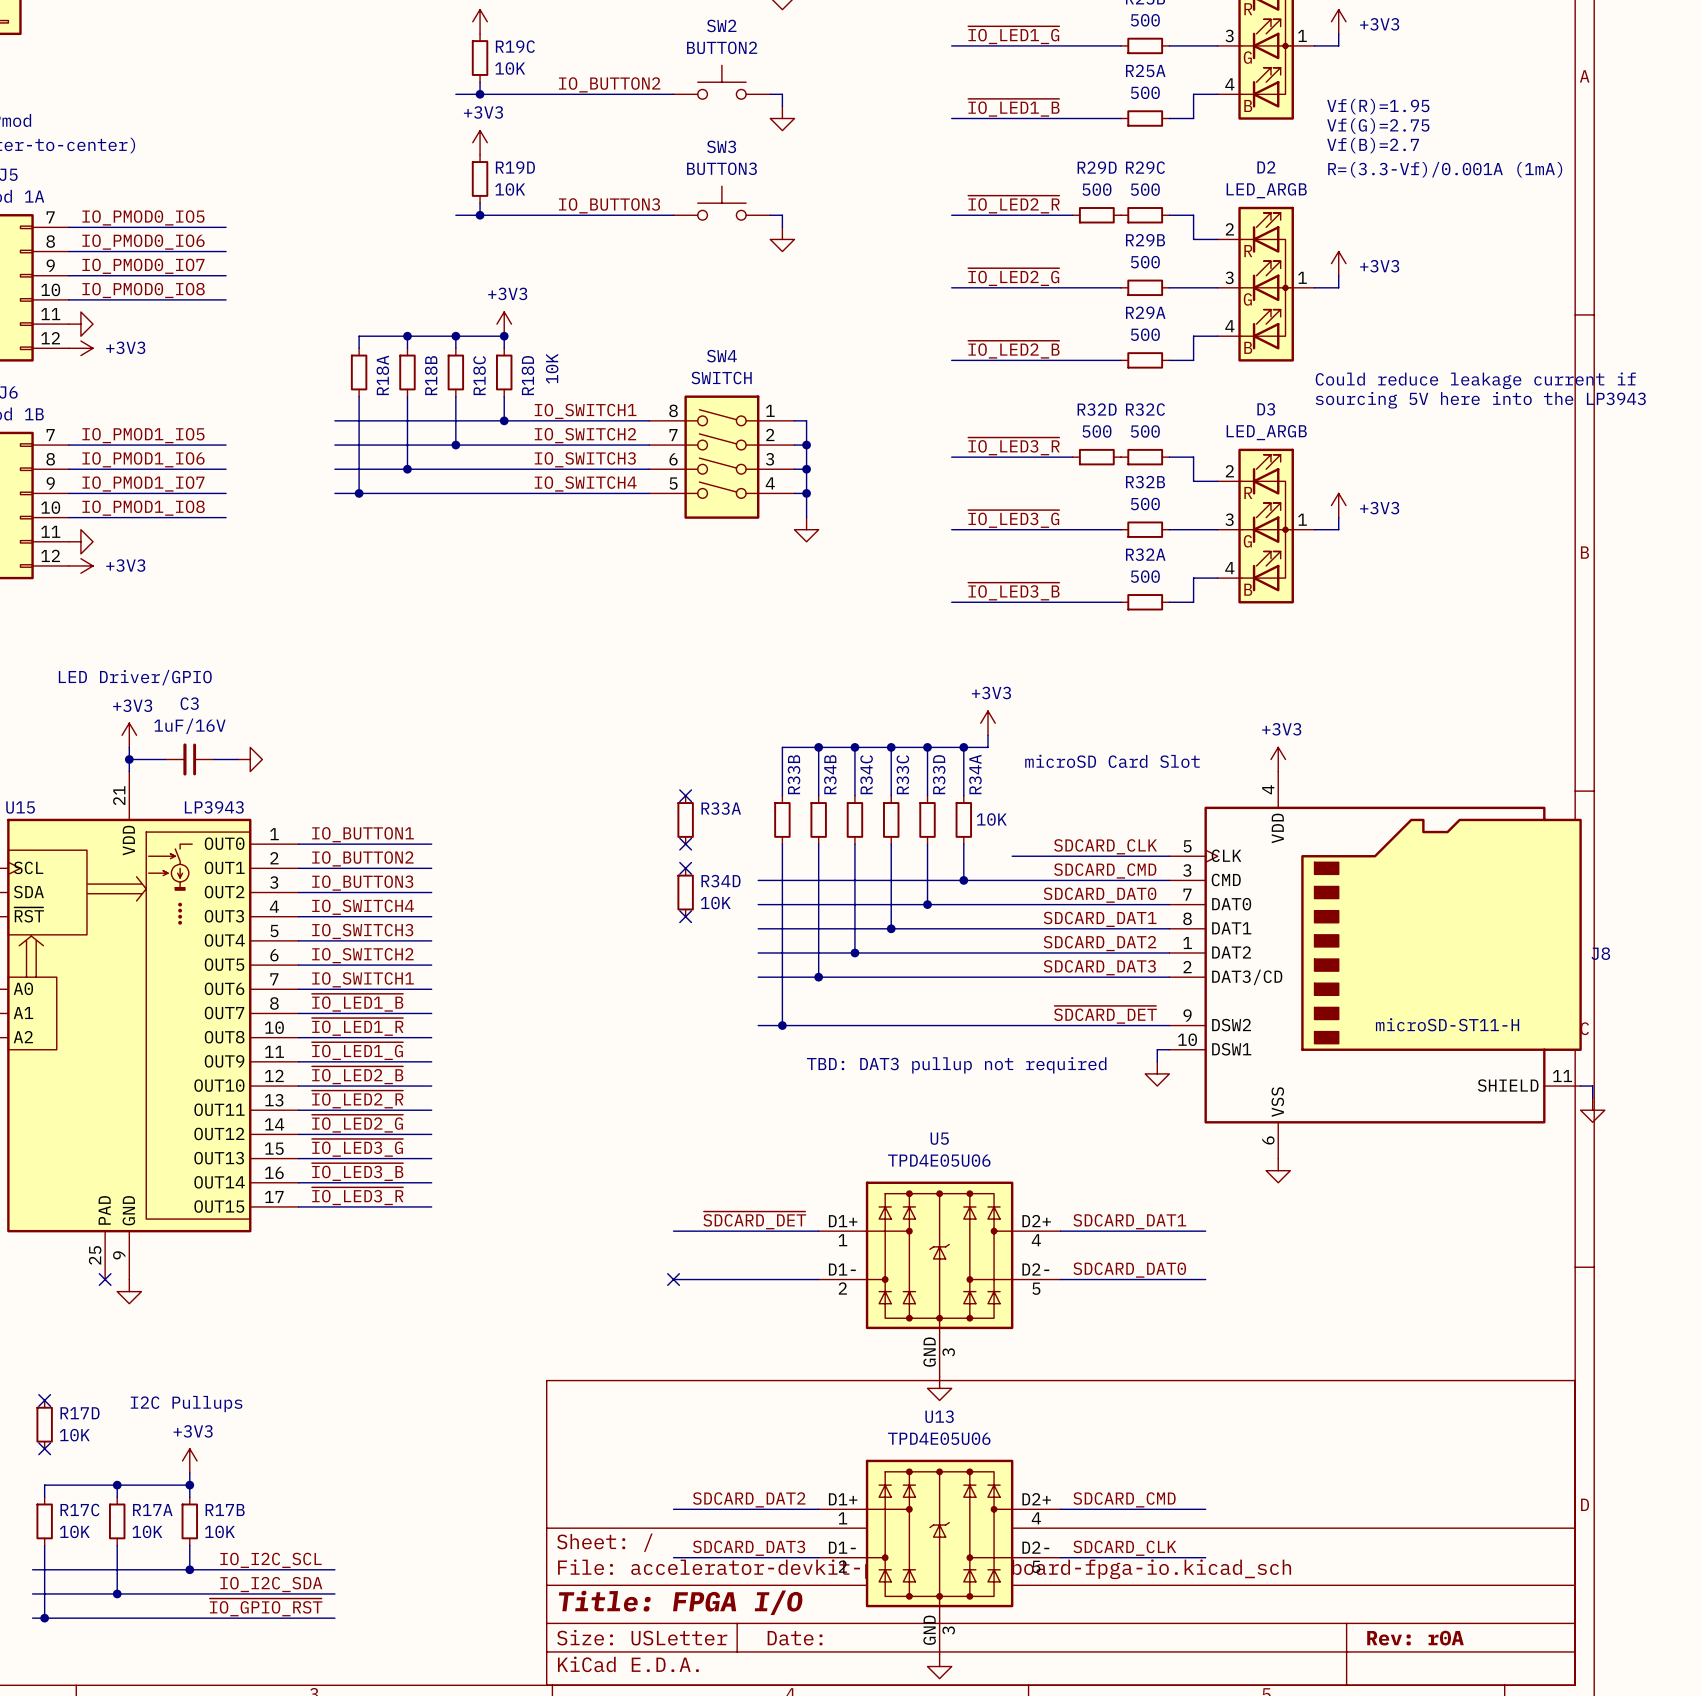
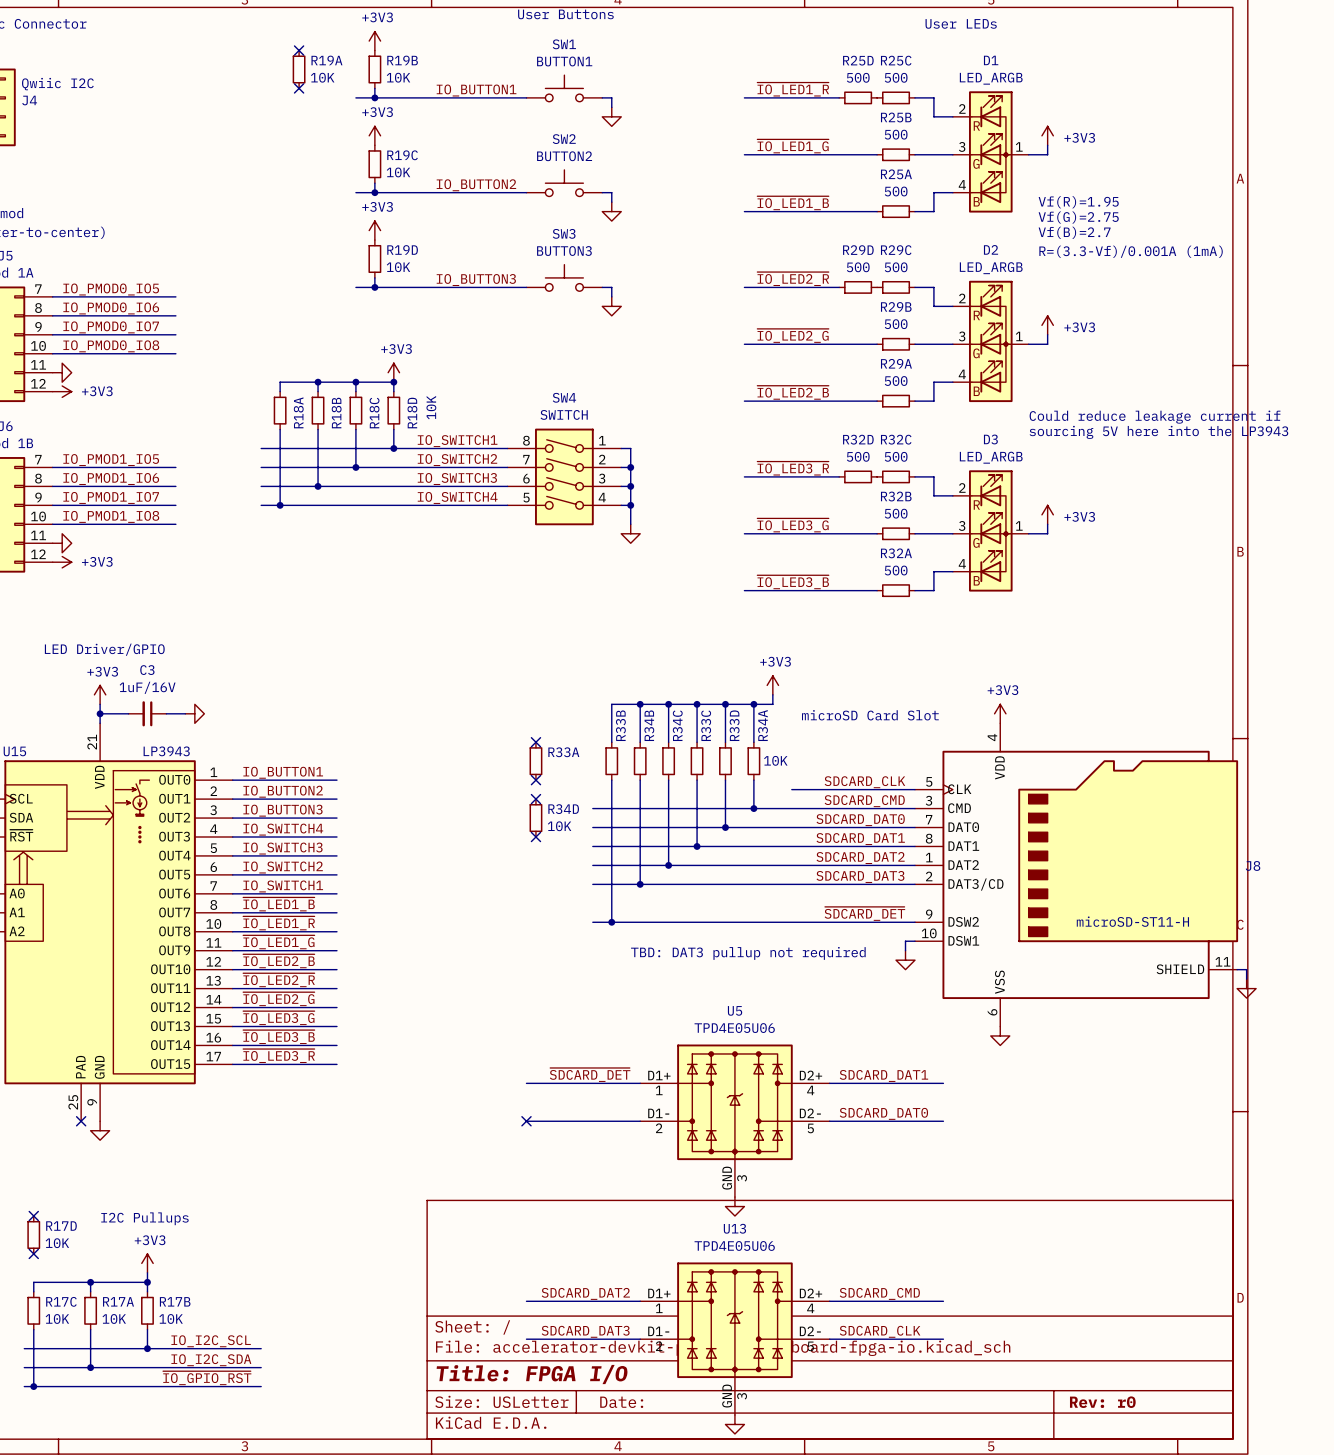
title block: Rev: r0A (1415, 1638) -> Rev: r0 (1102, 1402)

